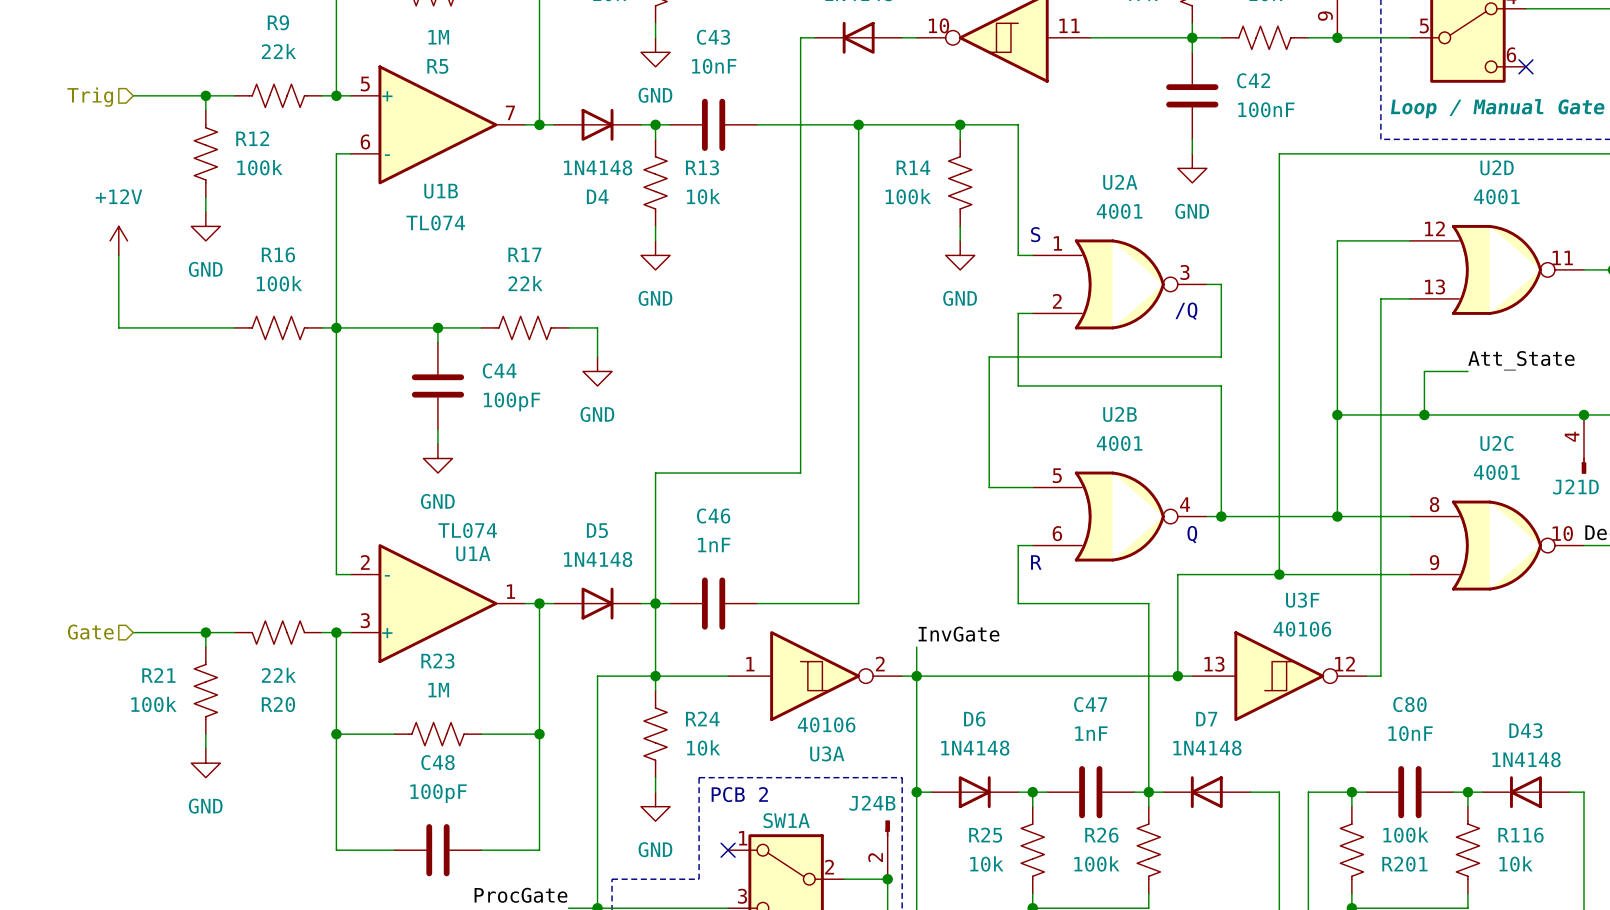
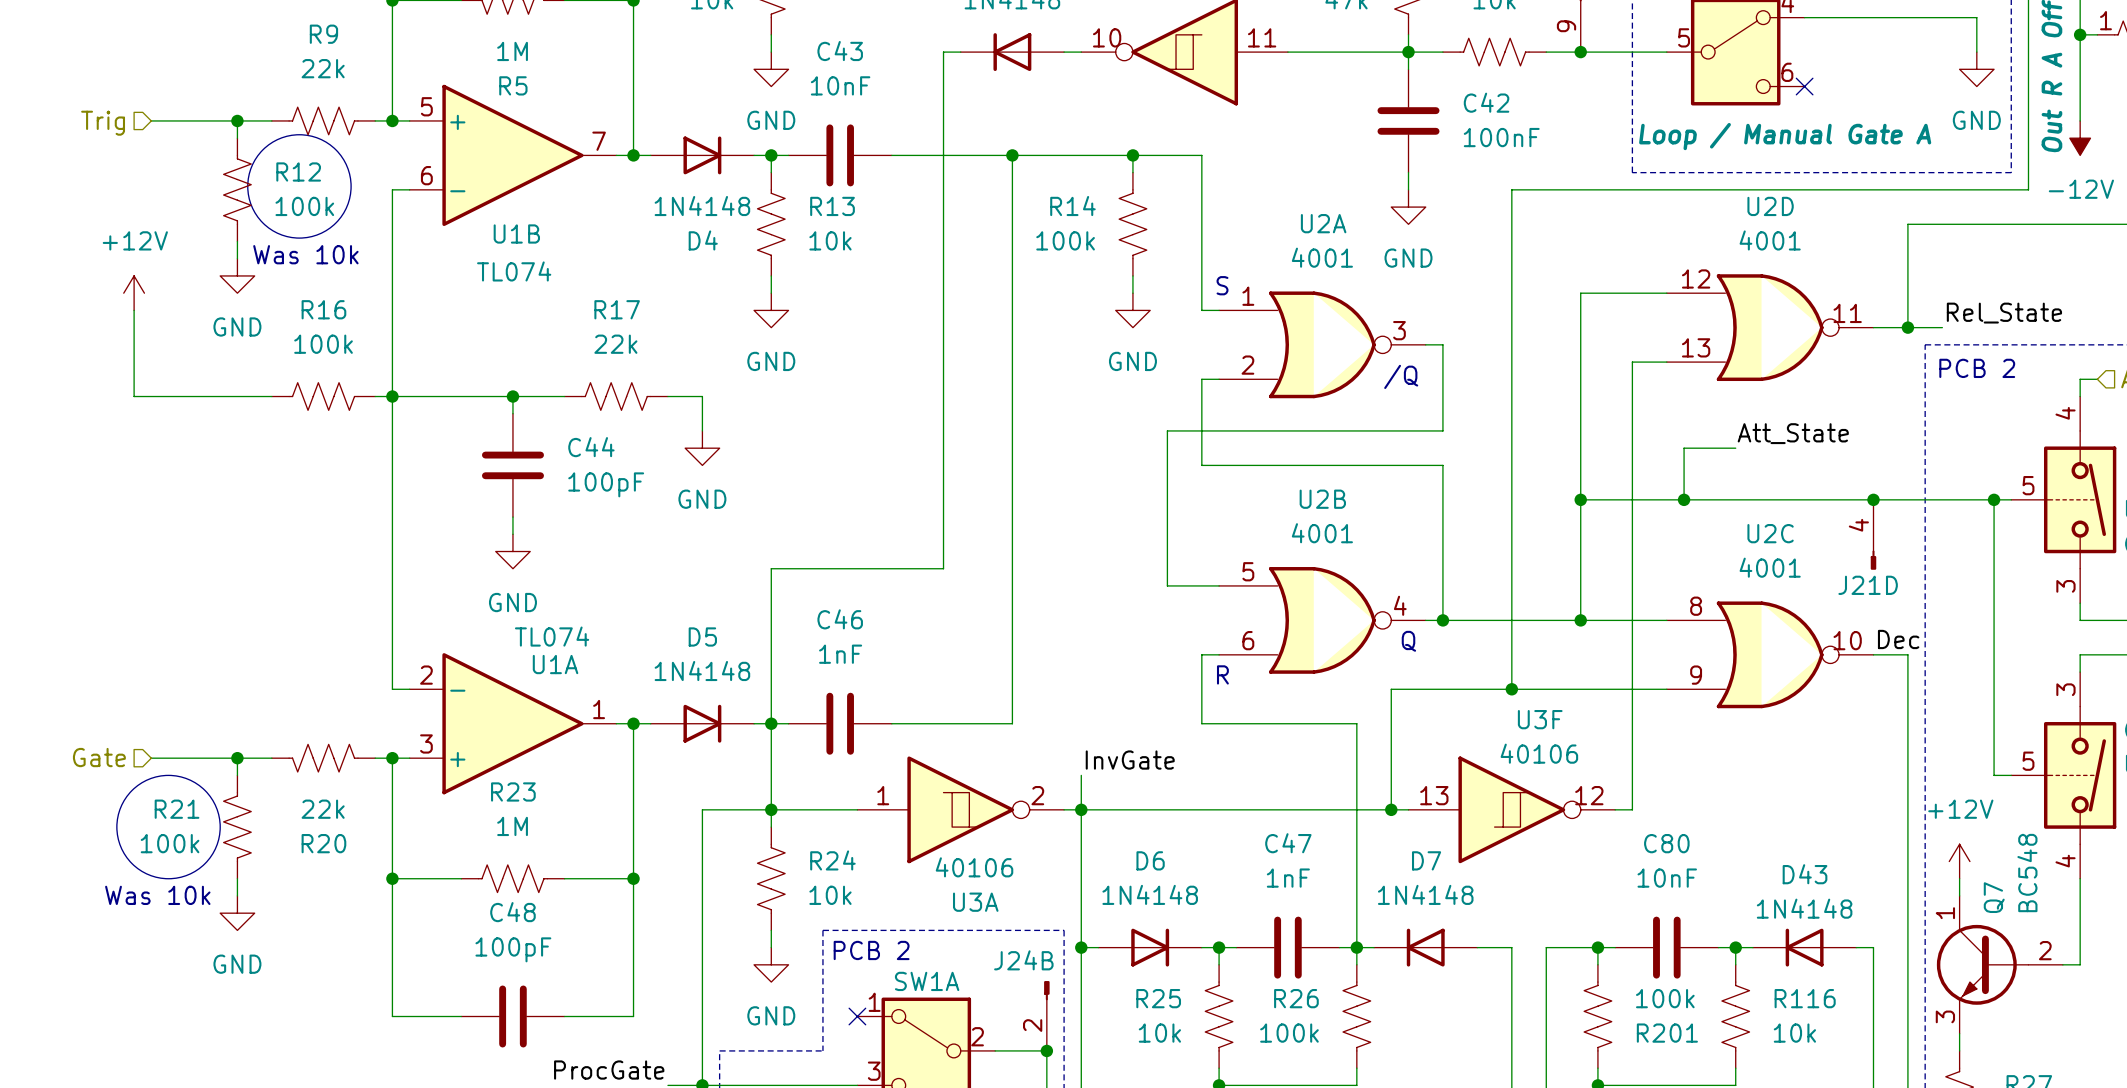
drawing: none -> [247, 134, 352, 239]
text: none -> Was 10k (305, 254)
drawing: none -> [116, 775, 221, 879]
text: none -> Was 10k (157, 895)

